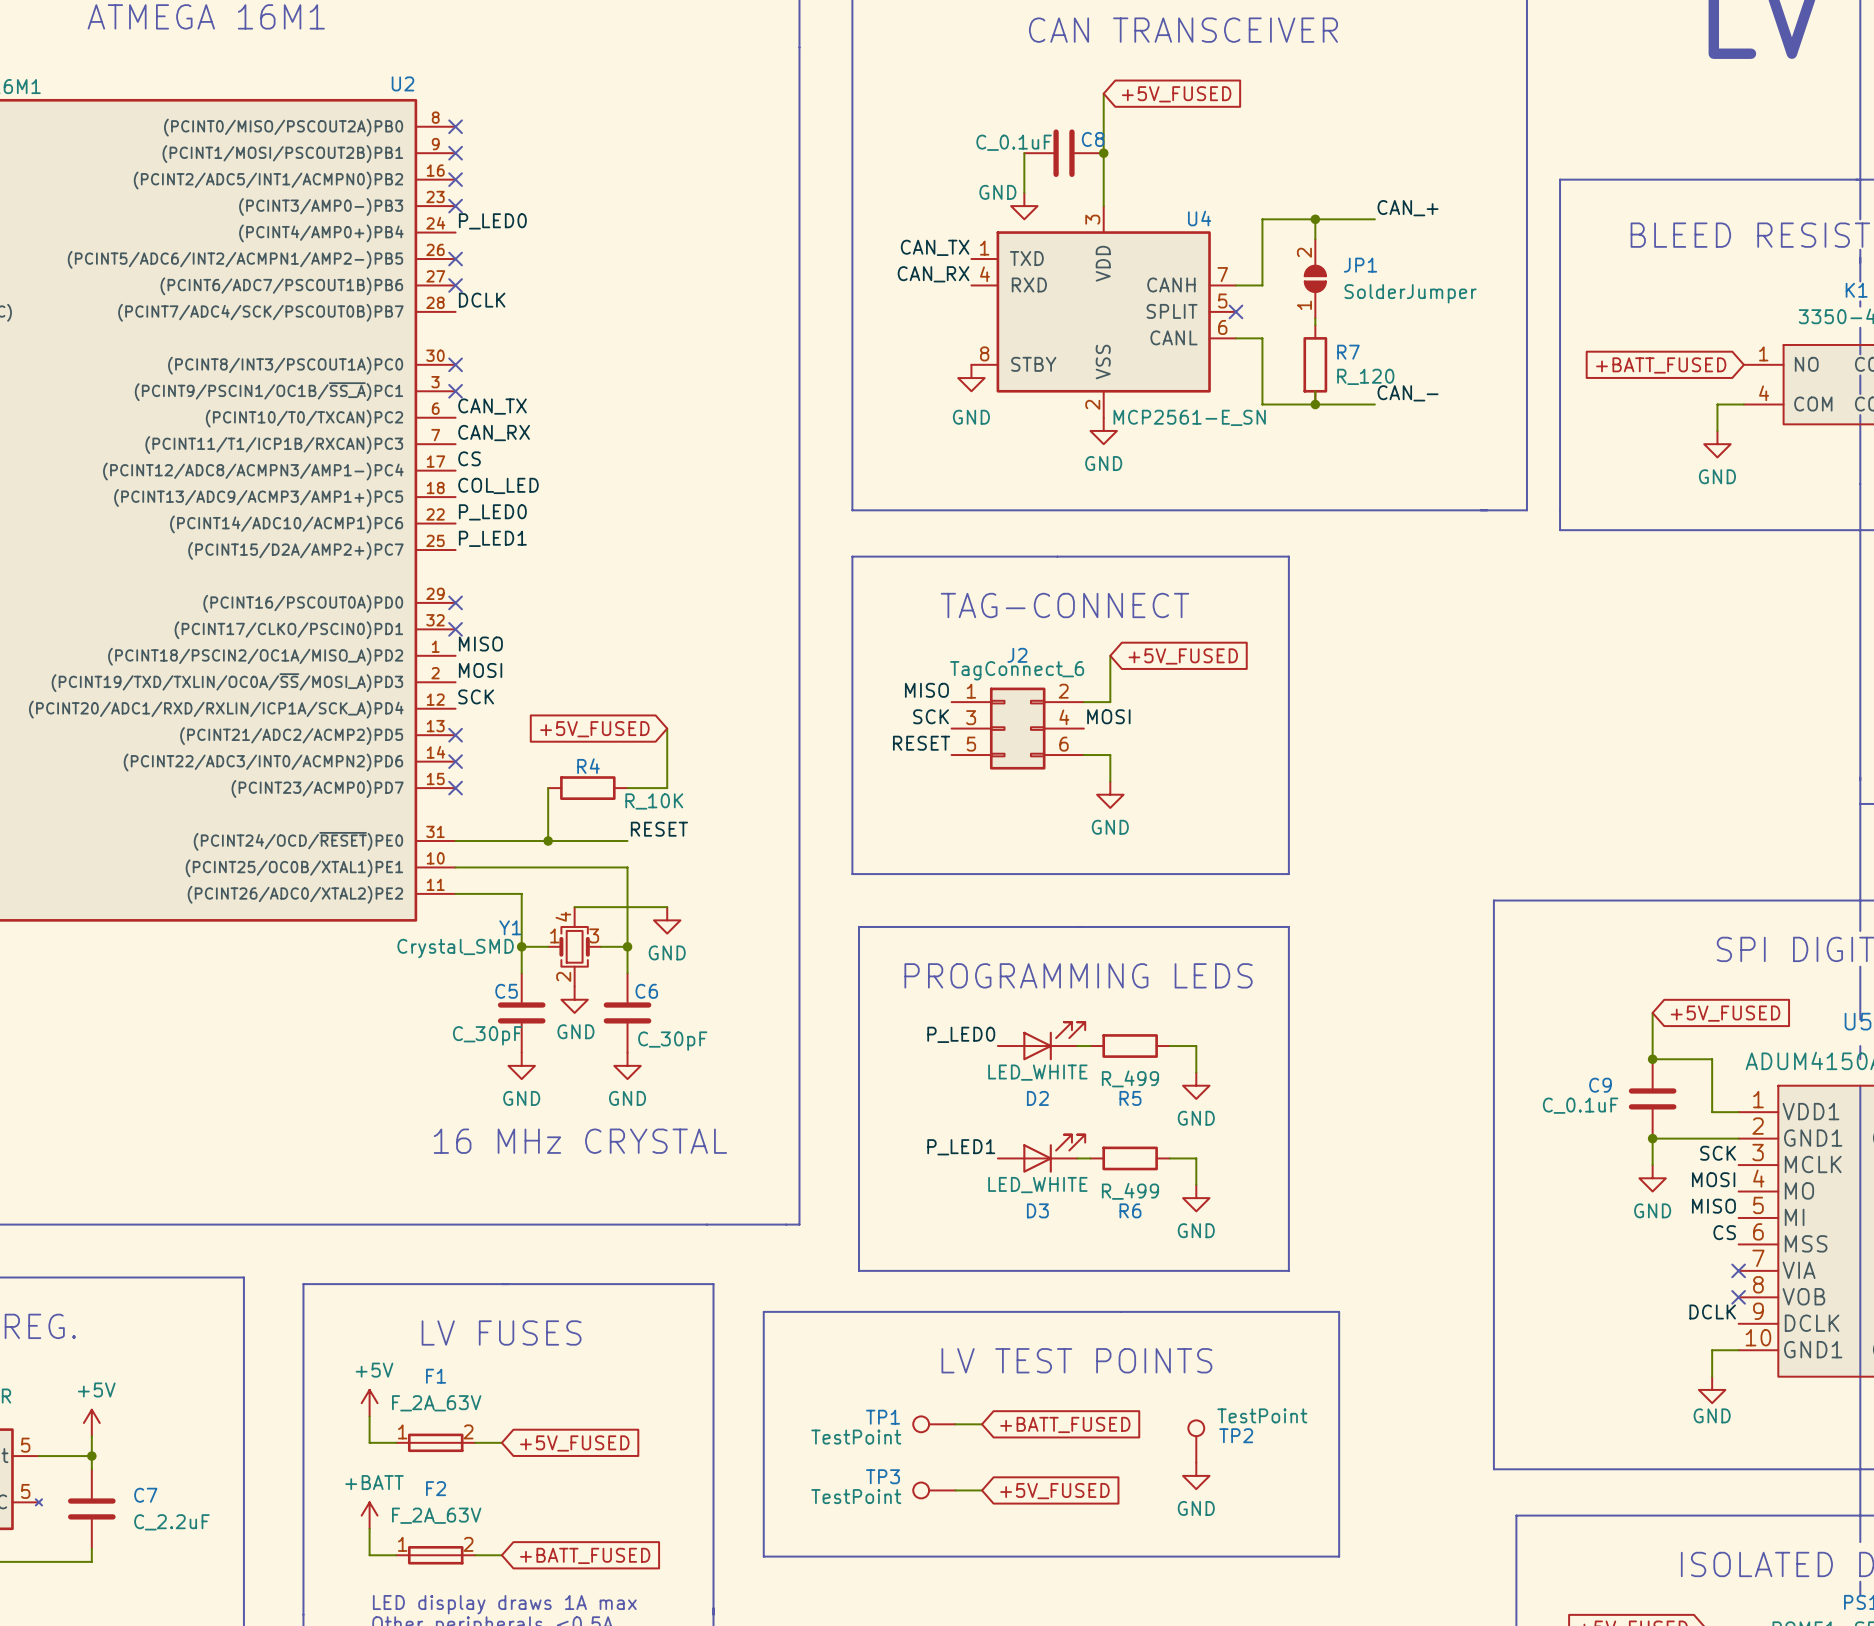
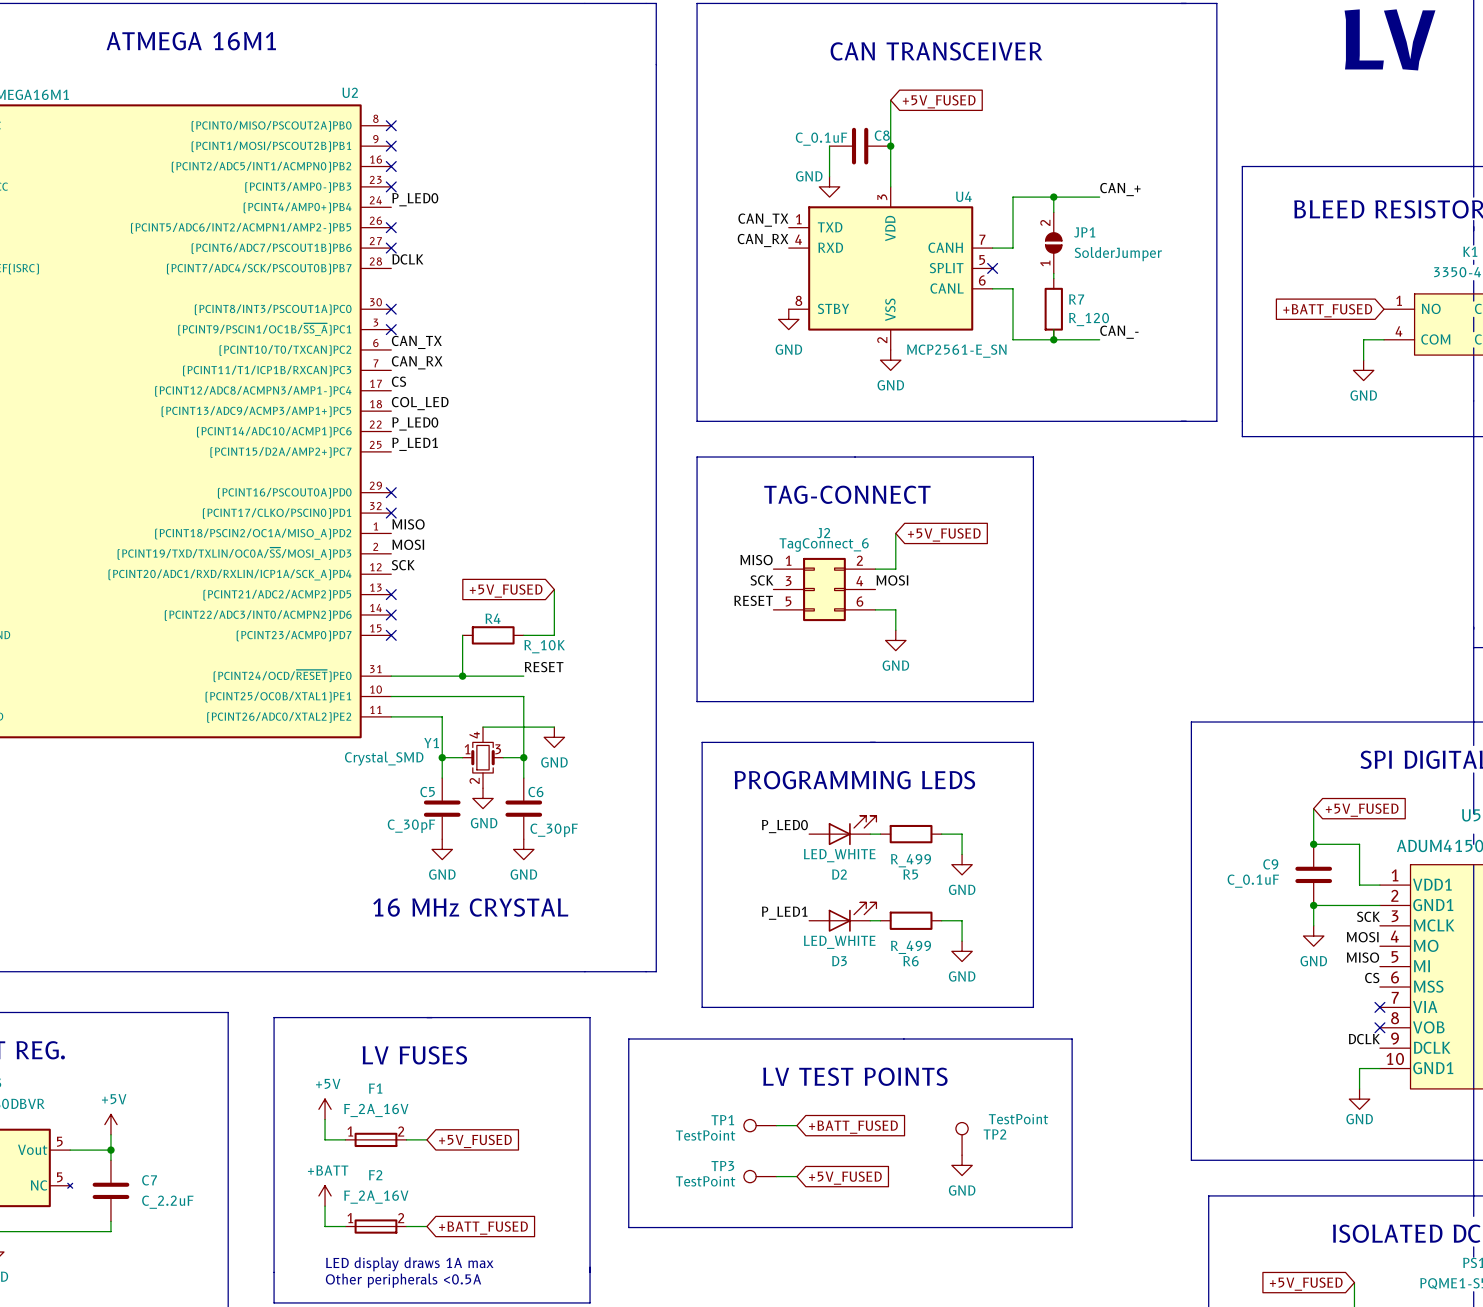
F1 value: F_2A_63V (436, 1403) -> F_2A_16V (376, 1110)
F2 value: F_2A_63V (436, 1515) -> F_2A_16V (376, 1197)

